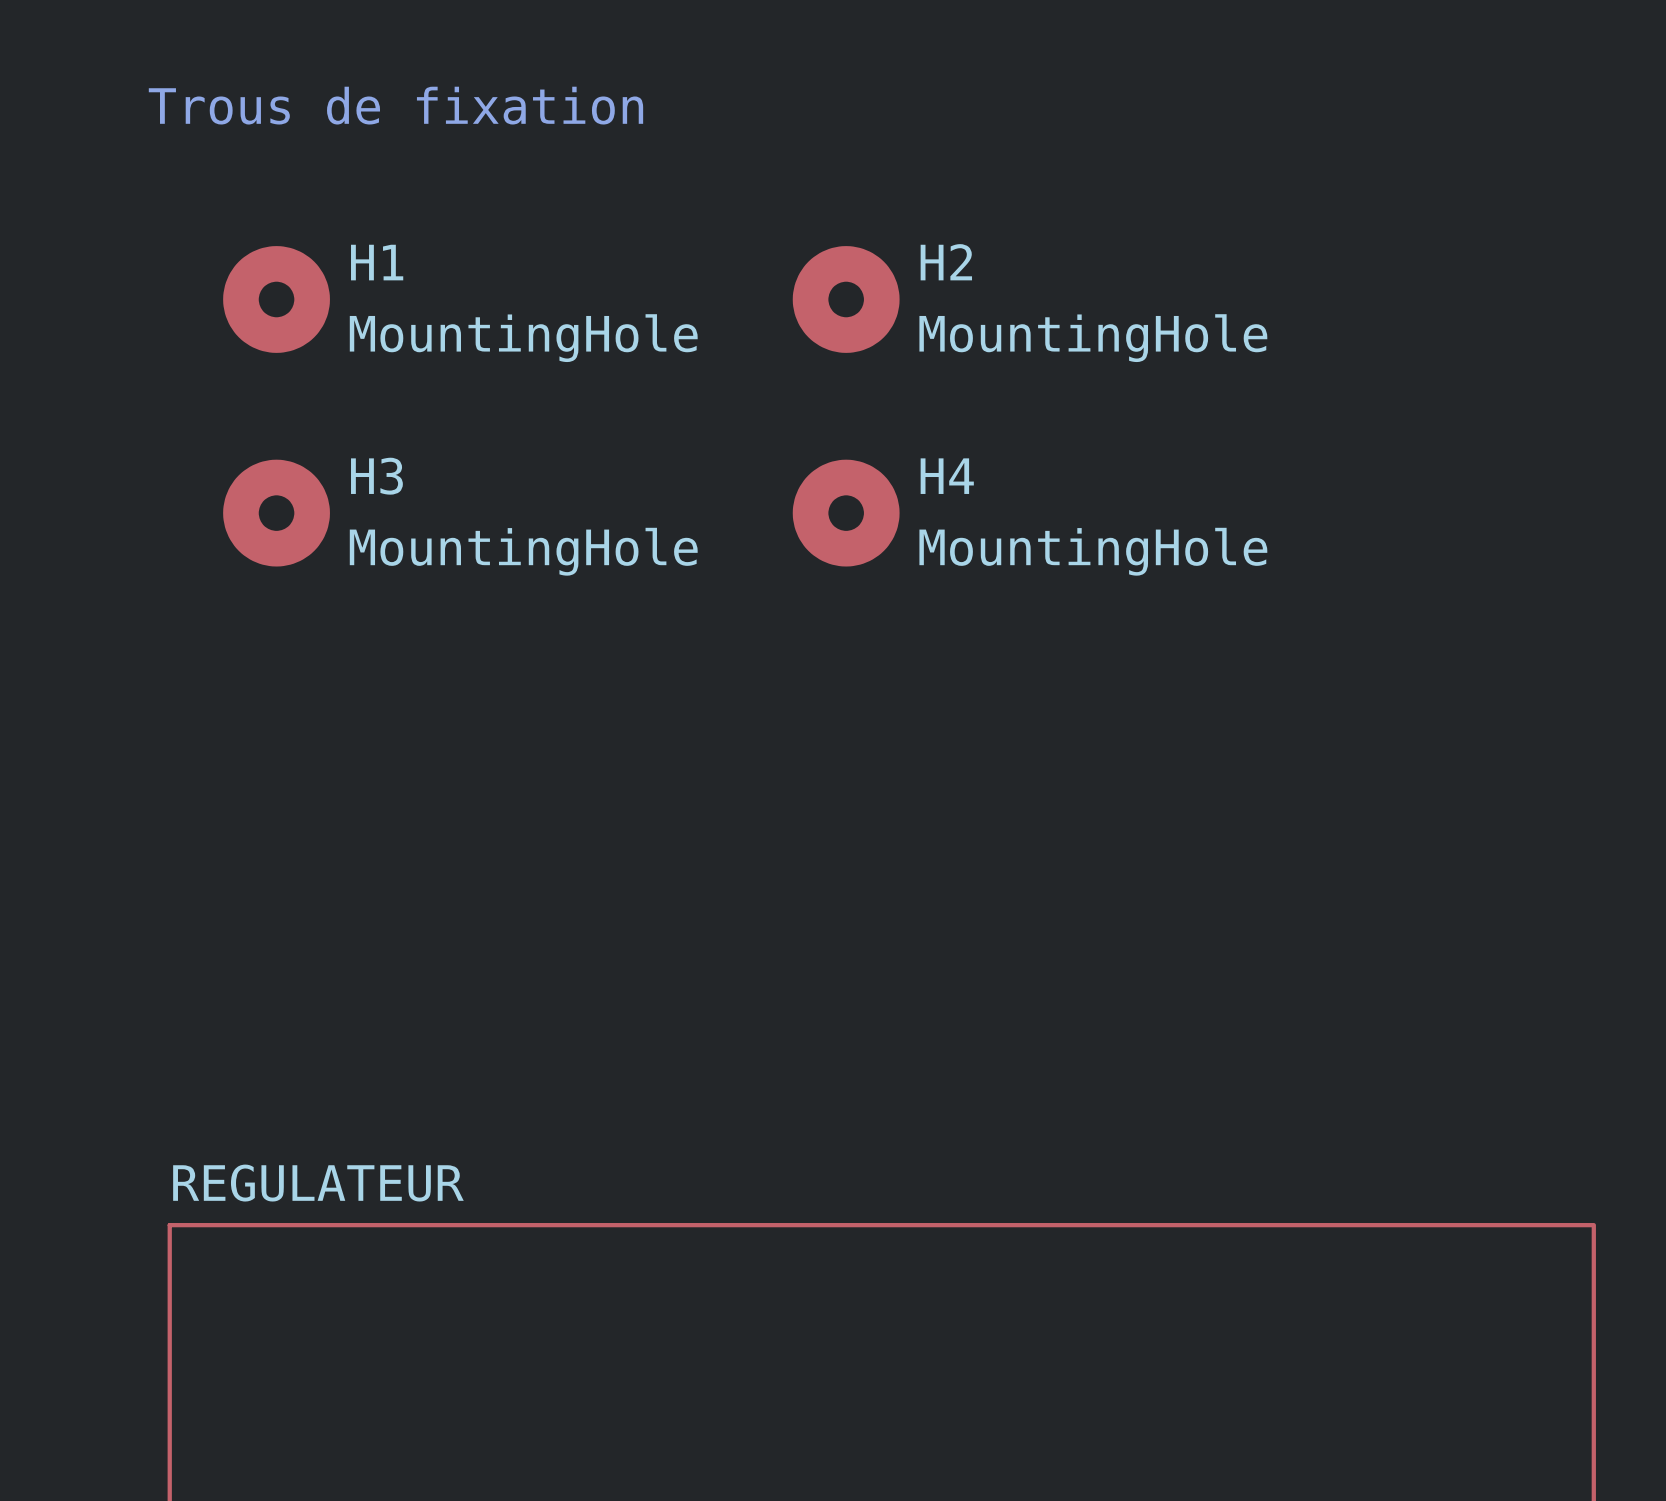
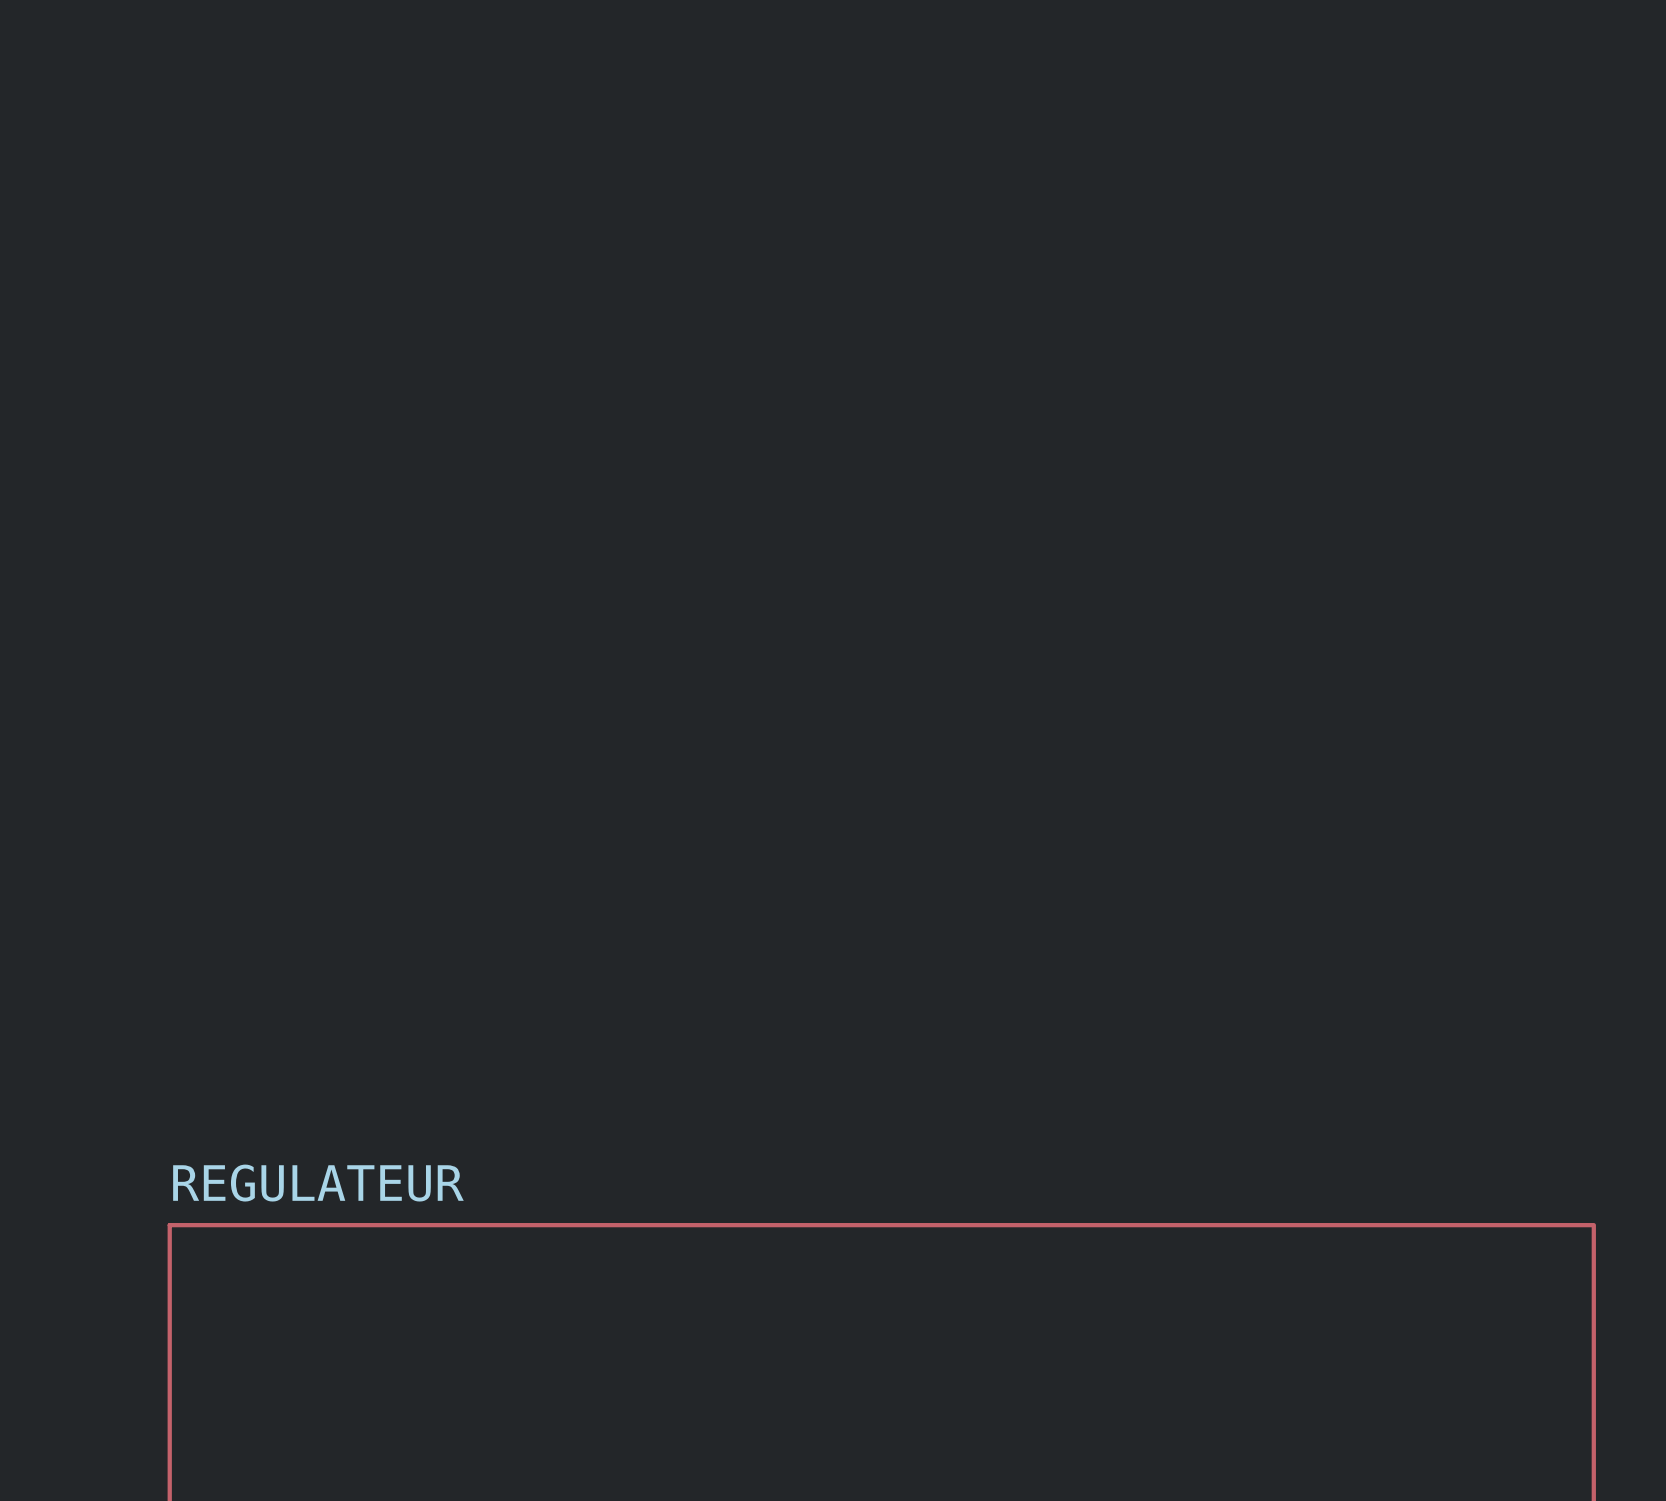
text: Trous de fixation (395, 105) -> none
H1: MountingHole (276, 299) -> none
H2: MountingHole (846, 299) -> none
H3: MountingHole (276, 513) -> none
H4: MountingHole (846, 513) -> none

